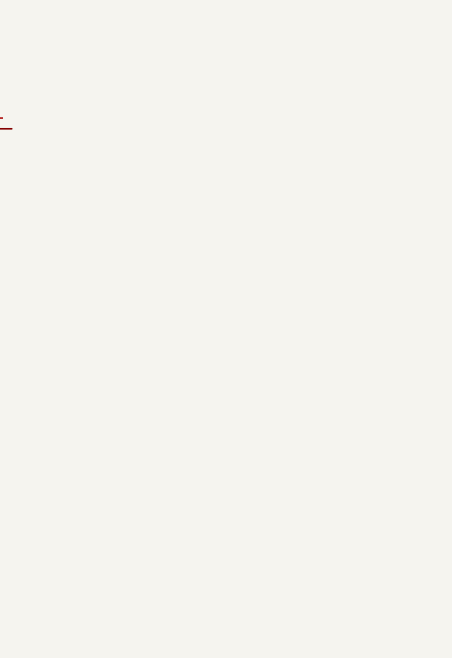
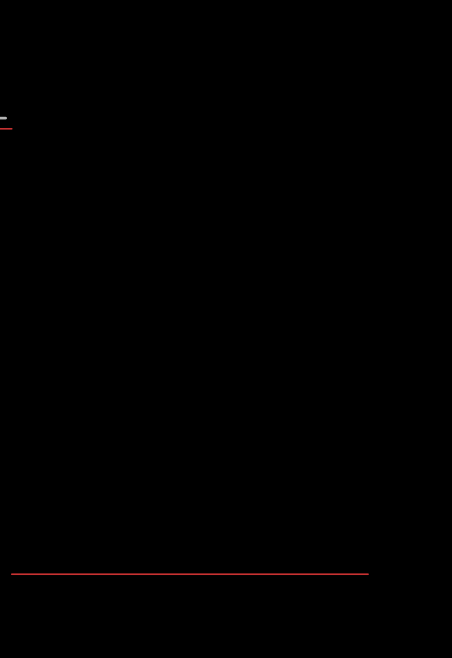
part: none -> (189, 574)

